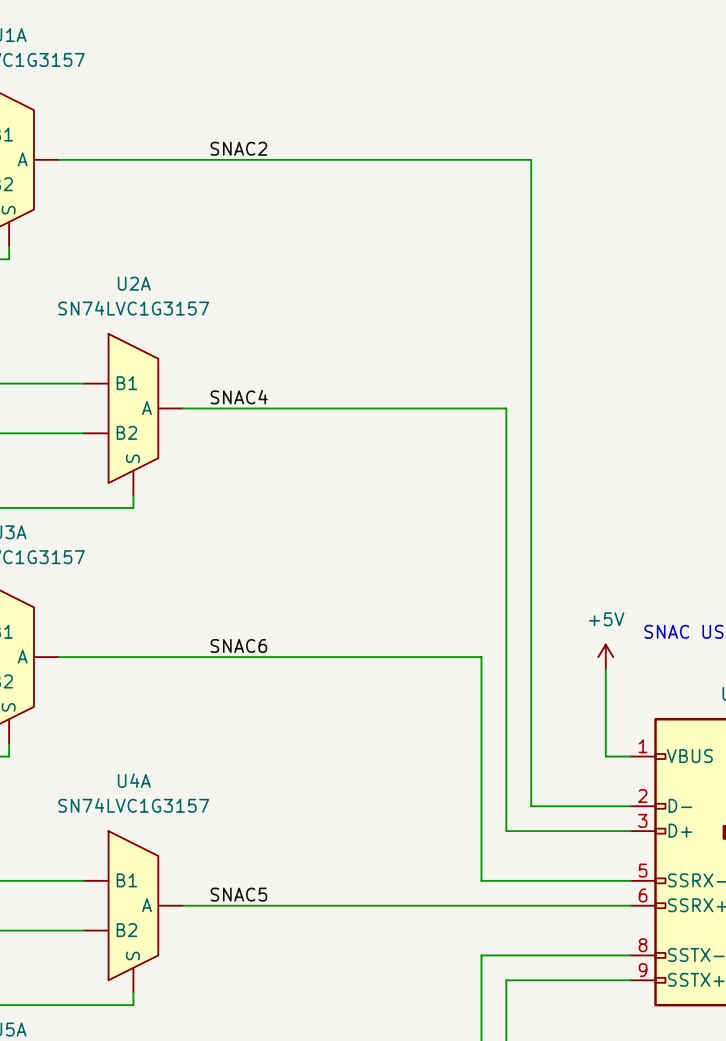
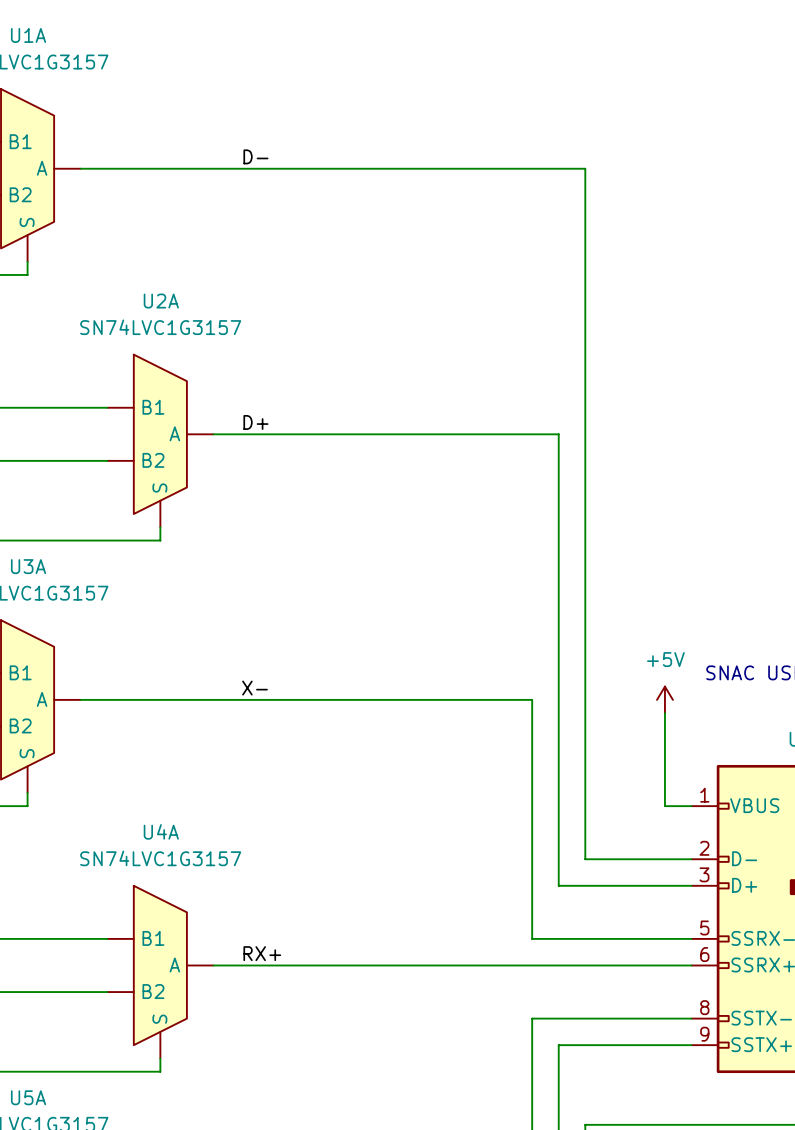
label: SNAC2 (238, 148) -> D- (255, 156)
label: SNAC4 (239, 397) -> D+ (255, 422)
label: SNAC6 (238, 646) -> X- (255, 688)
label: SNAC5 (238, 894) -> RX+ (262, 953)

